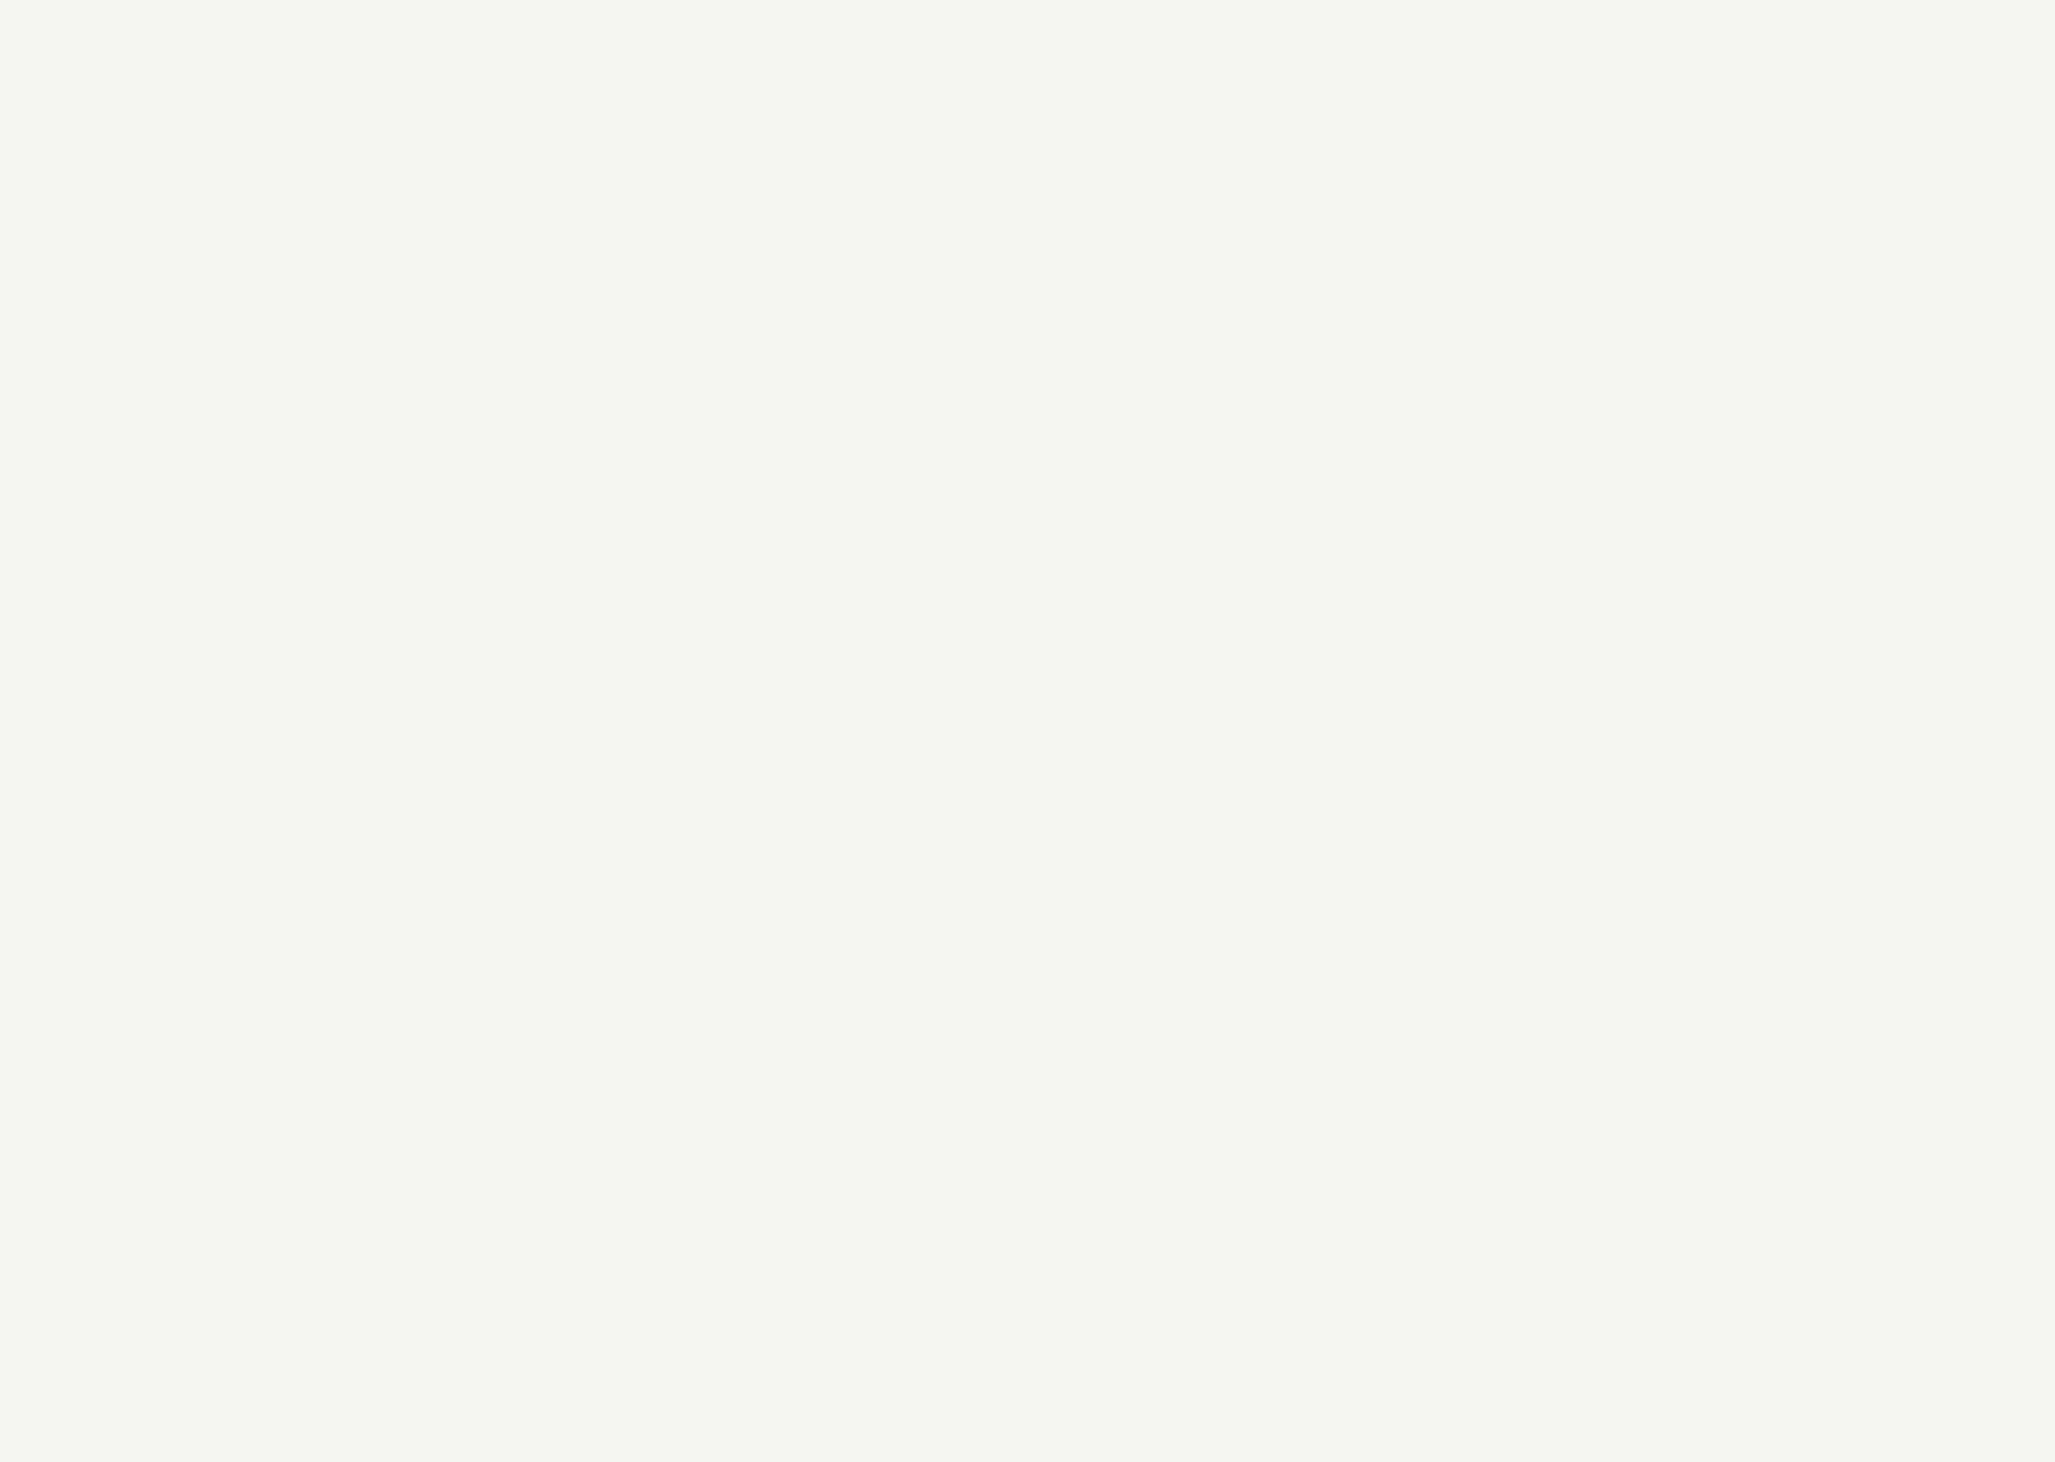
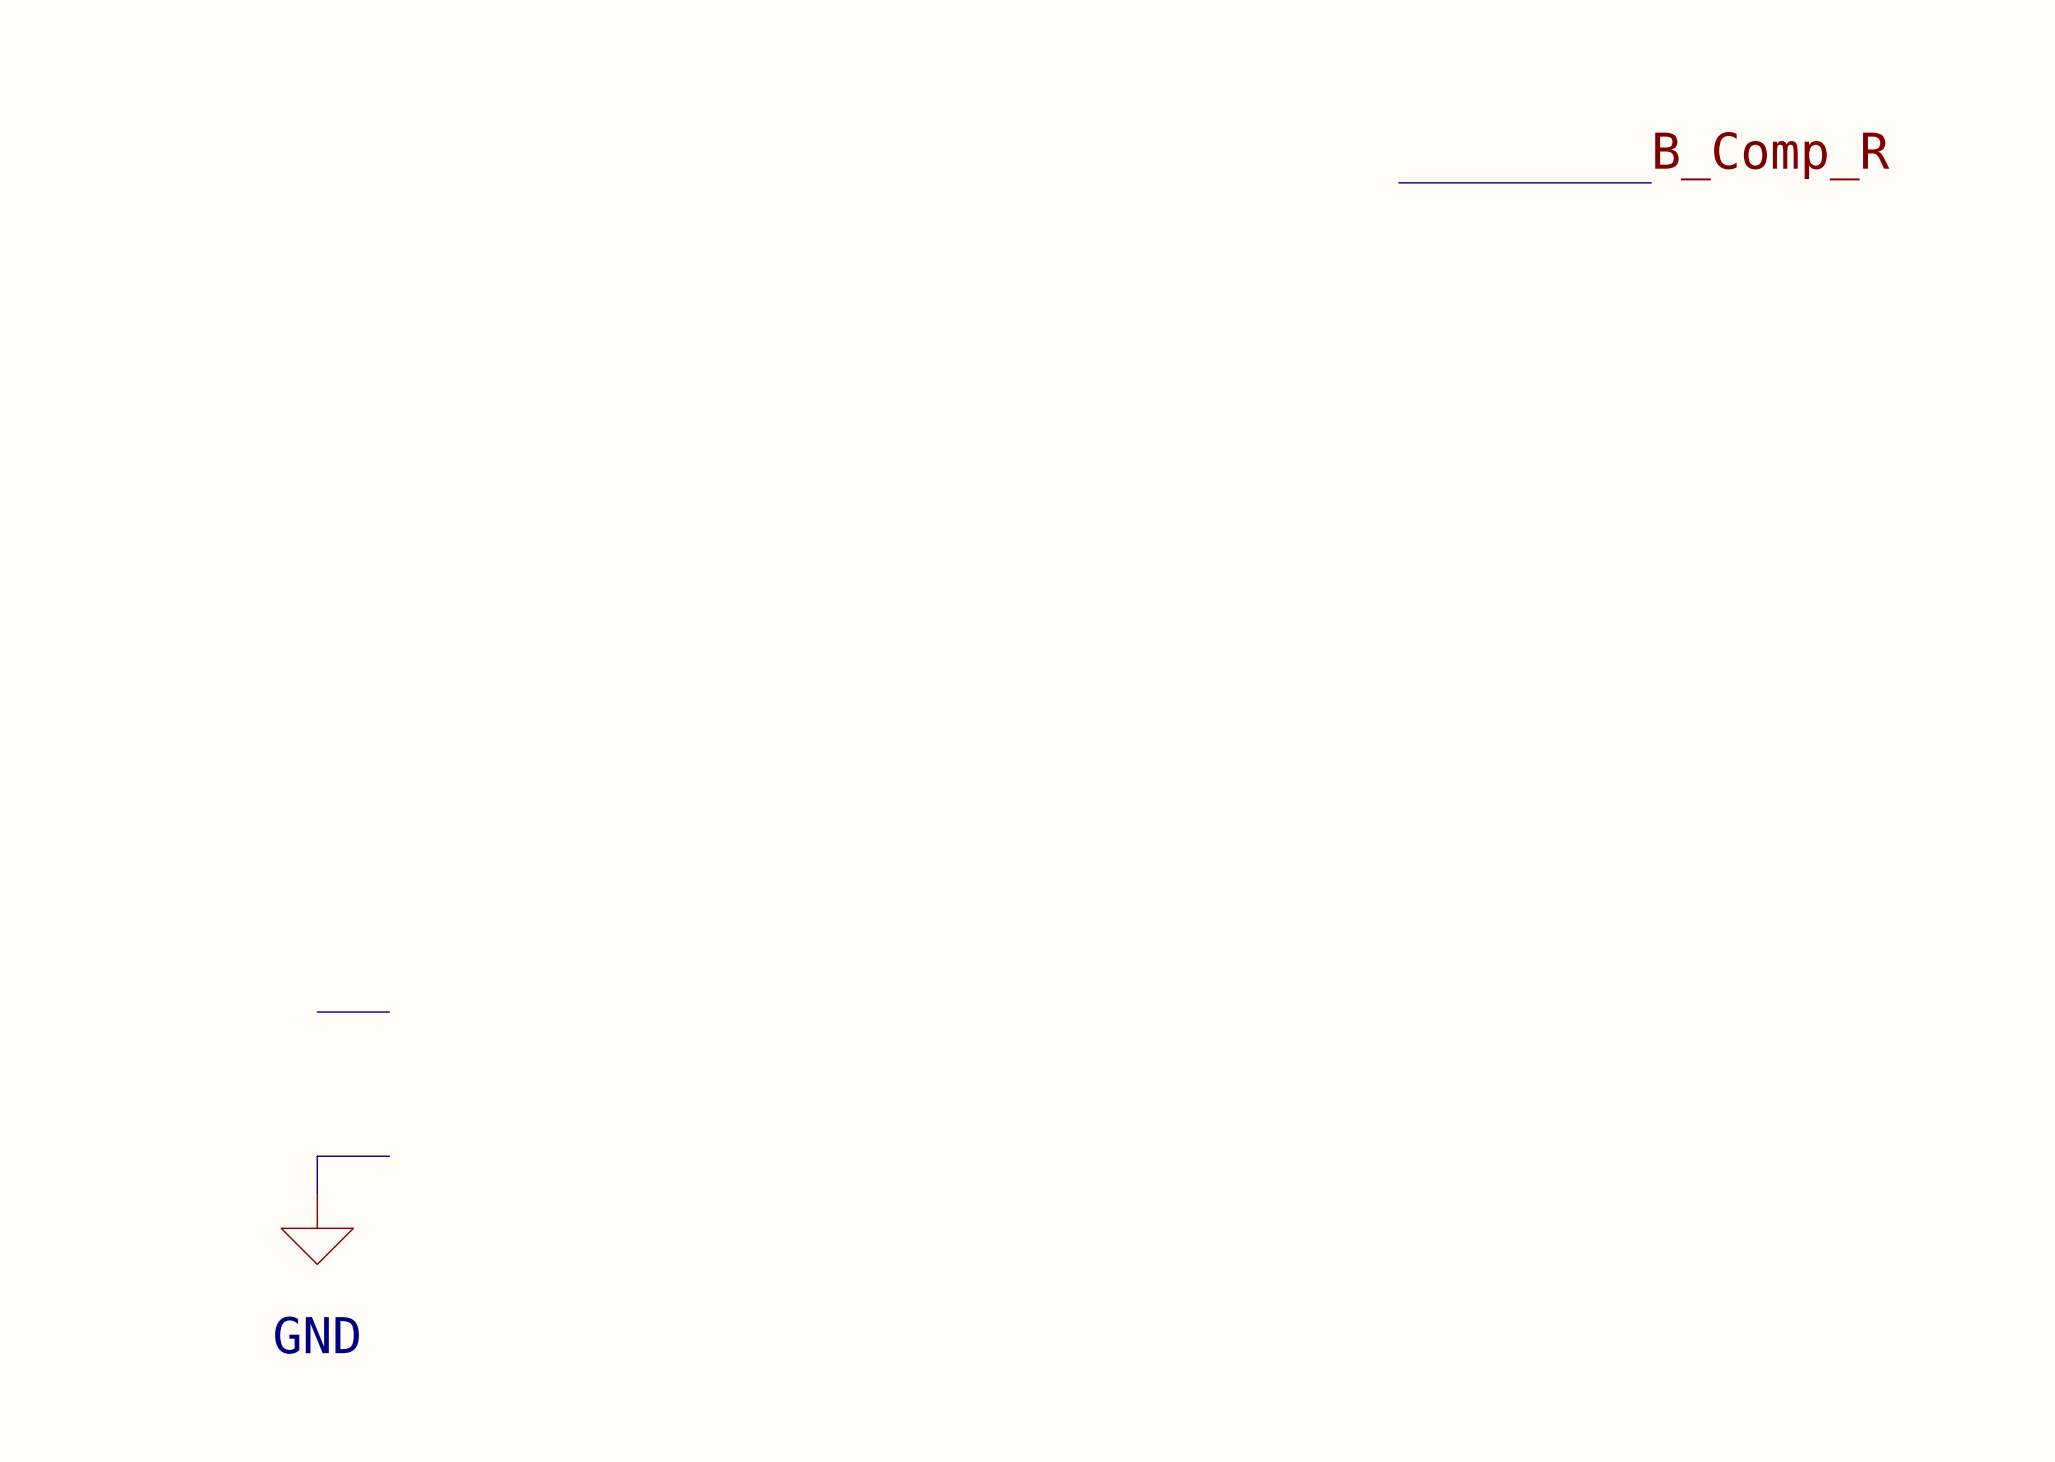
label: none -> B_Comp_R (1772, 156)
wire: none -> (1398, 182) (1651, 182)
wire: none -> (317, 1012) (389, 1012)
wire: none -> (389, 1156) (317, 1156) (317, 1192)
power symbol: none -> GND (317, 1228)

